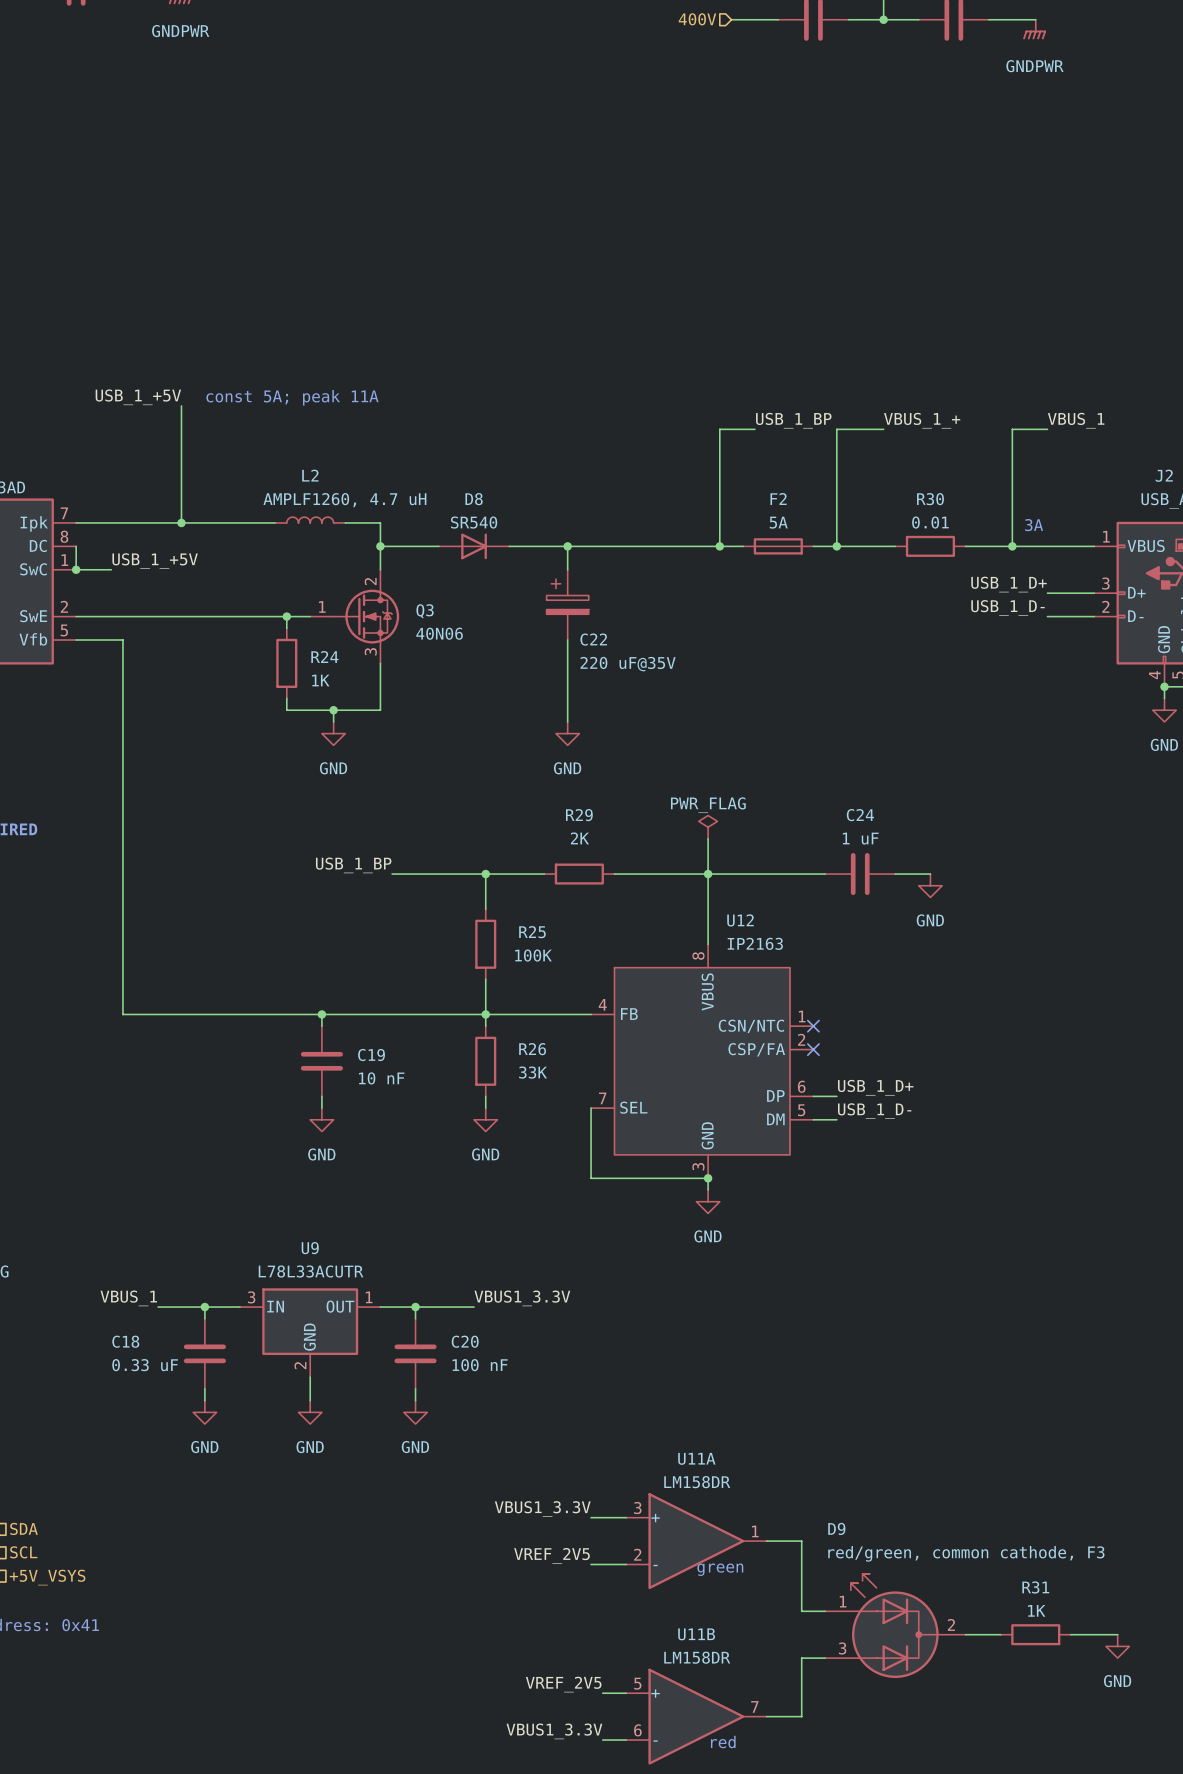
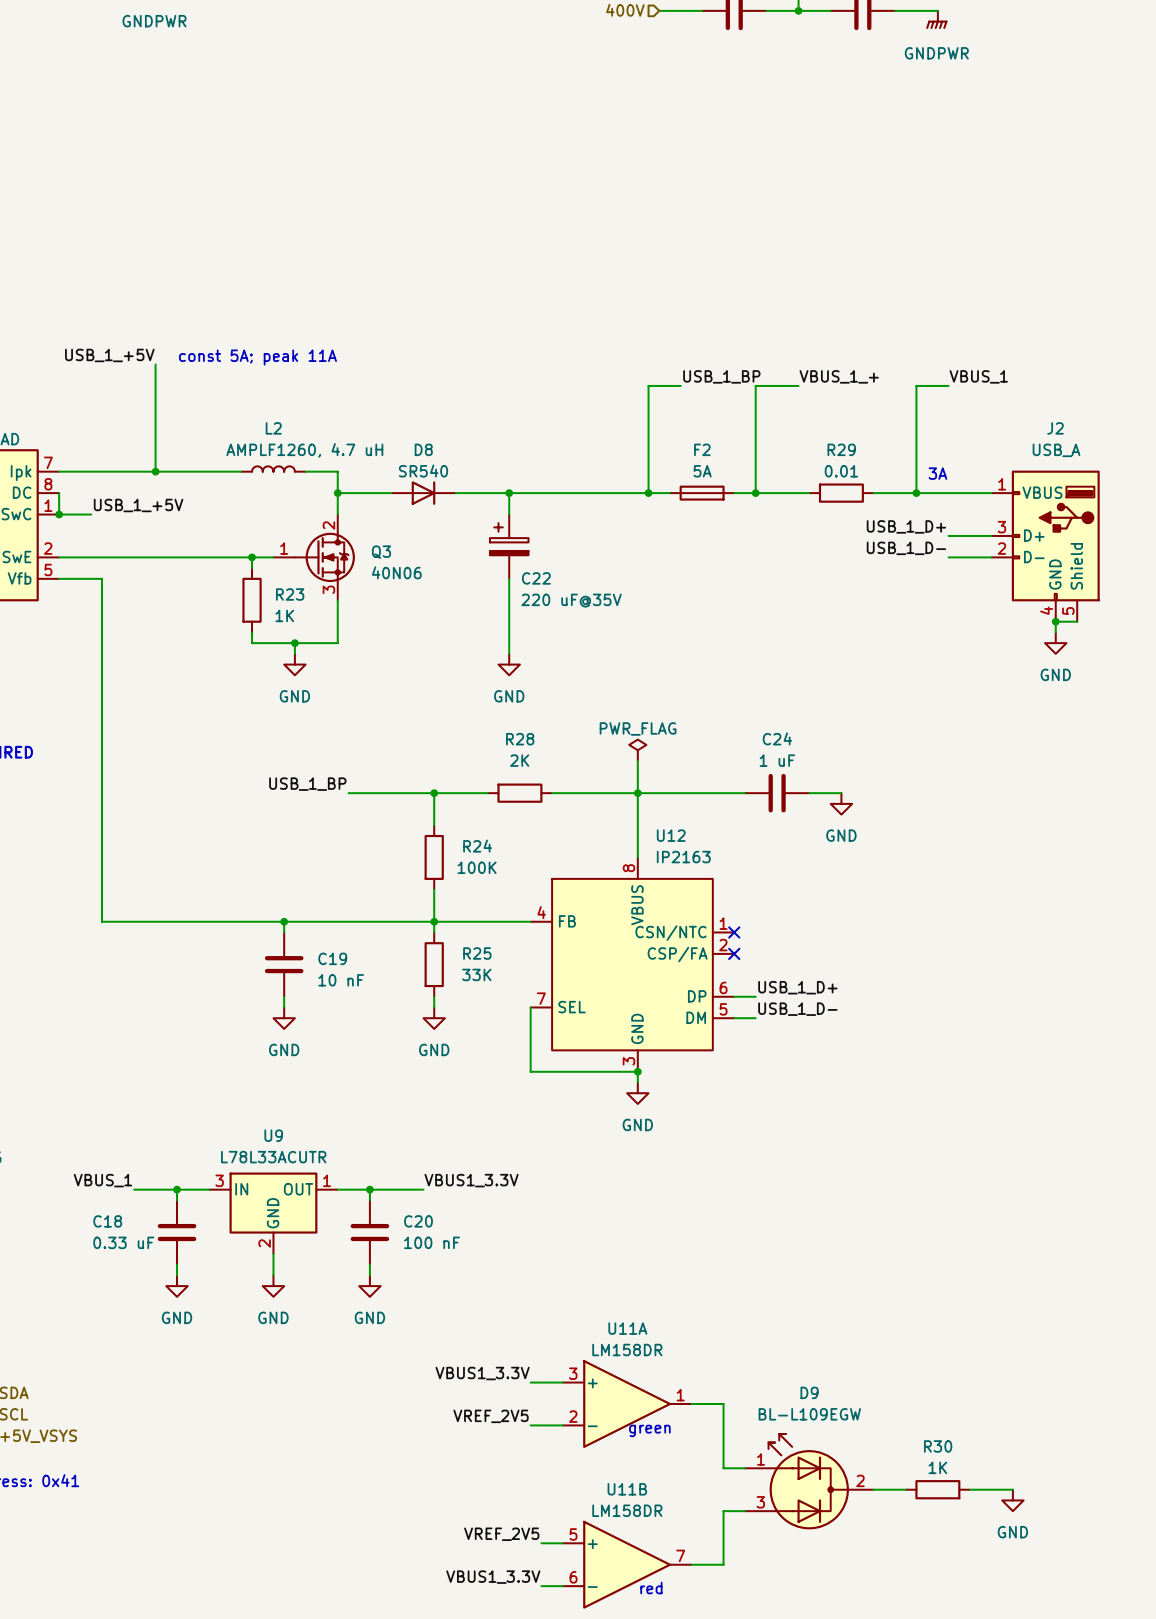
R30 name: R30 (930, 499) -> R29 (841, 449)
R24 name: R24 (324, 657) -> R23 (290, 594)
R29 name: R29 (579, 815) -> R28 (520, 739)
R25 name: R25 (532, 932) -> R24 (477, 846)
R26 name: R26 (532, 1049) -> R25 (477, 953)
D9 name position: D9 (836, 1528) -> D9 (809, 1392)
D9 value: red/green, common cathode, F3 (966, 1553) -> BL-L109EGW (809, 1414)
R31 name: R31 (1035, 1587) -> R30 (938, 1446)

